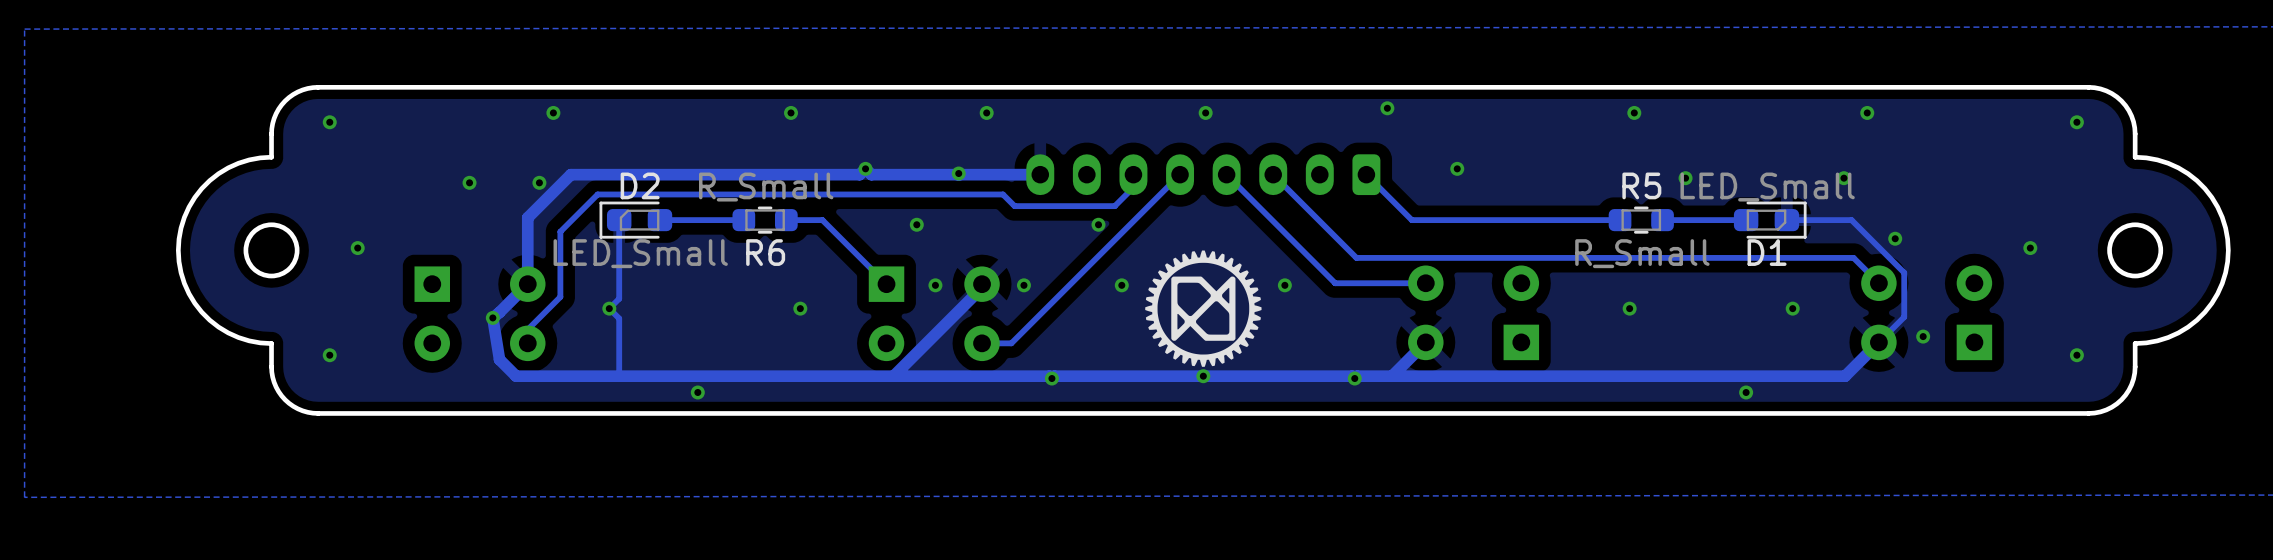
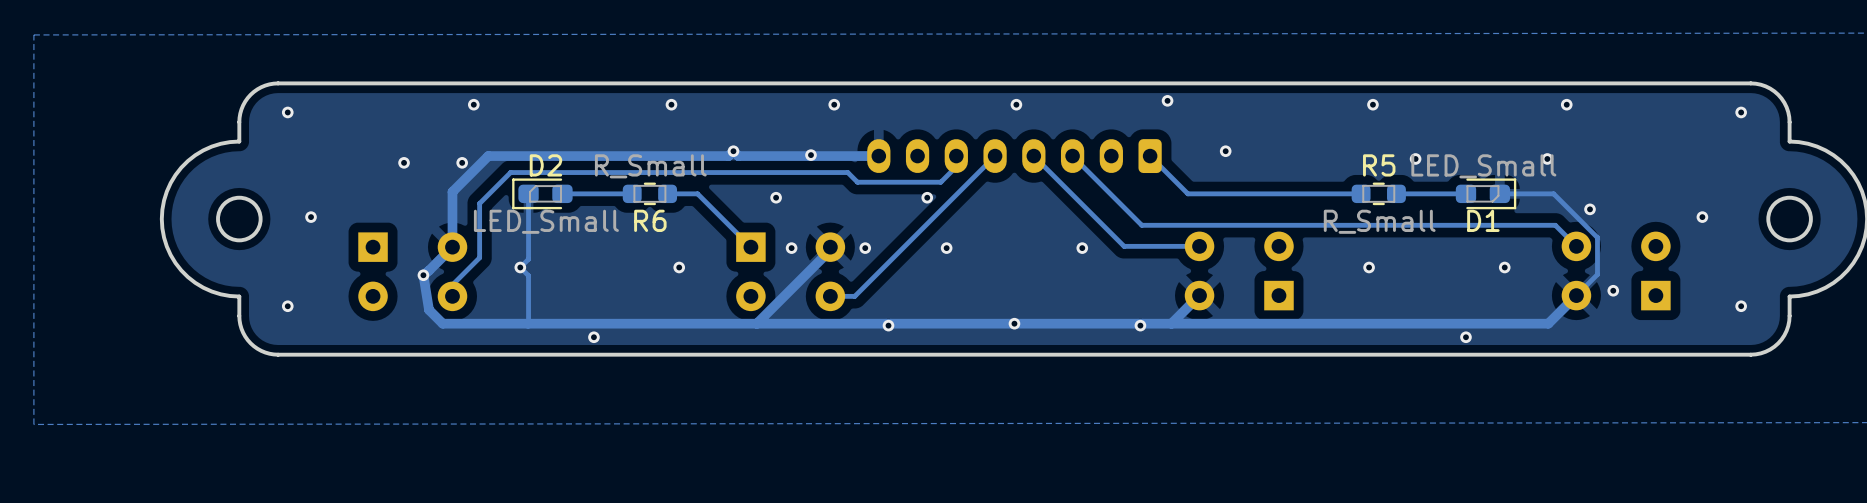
drawing: [1145, 250, 1262, 367] -> none

